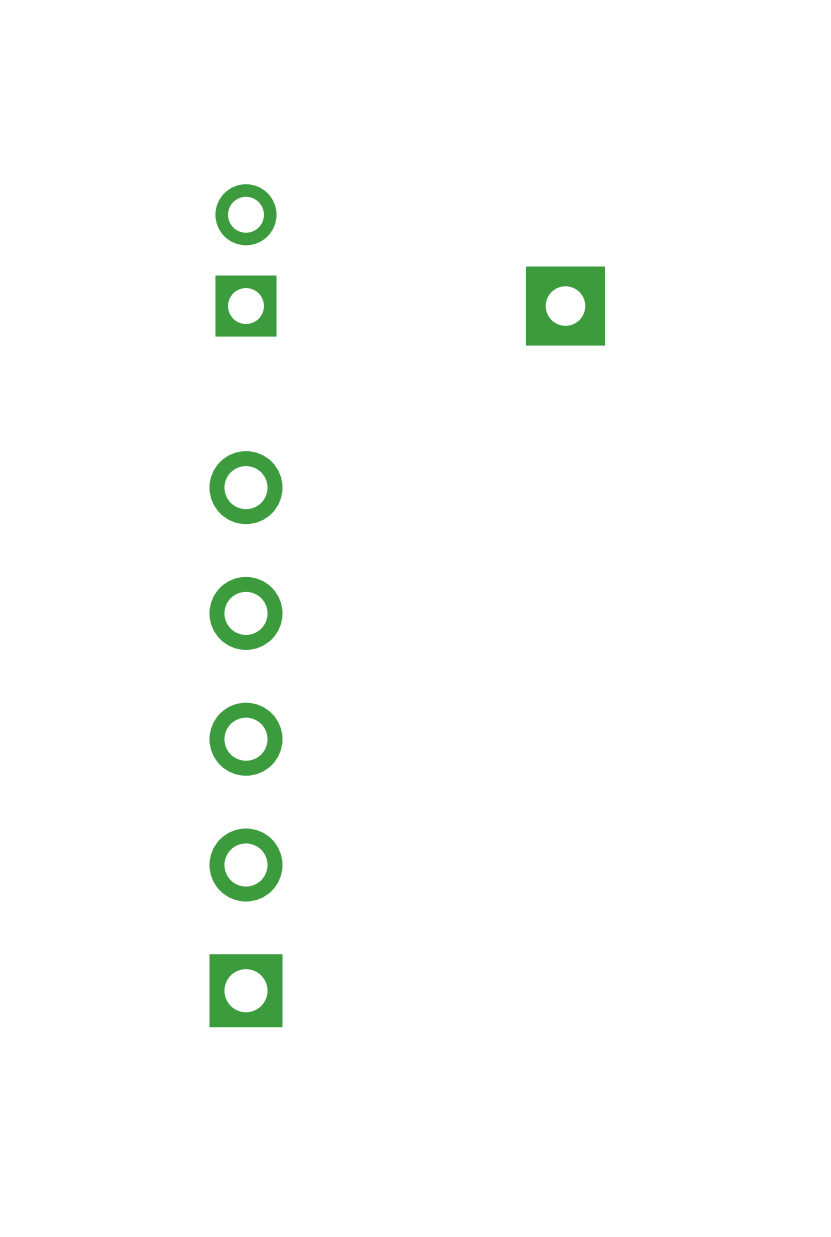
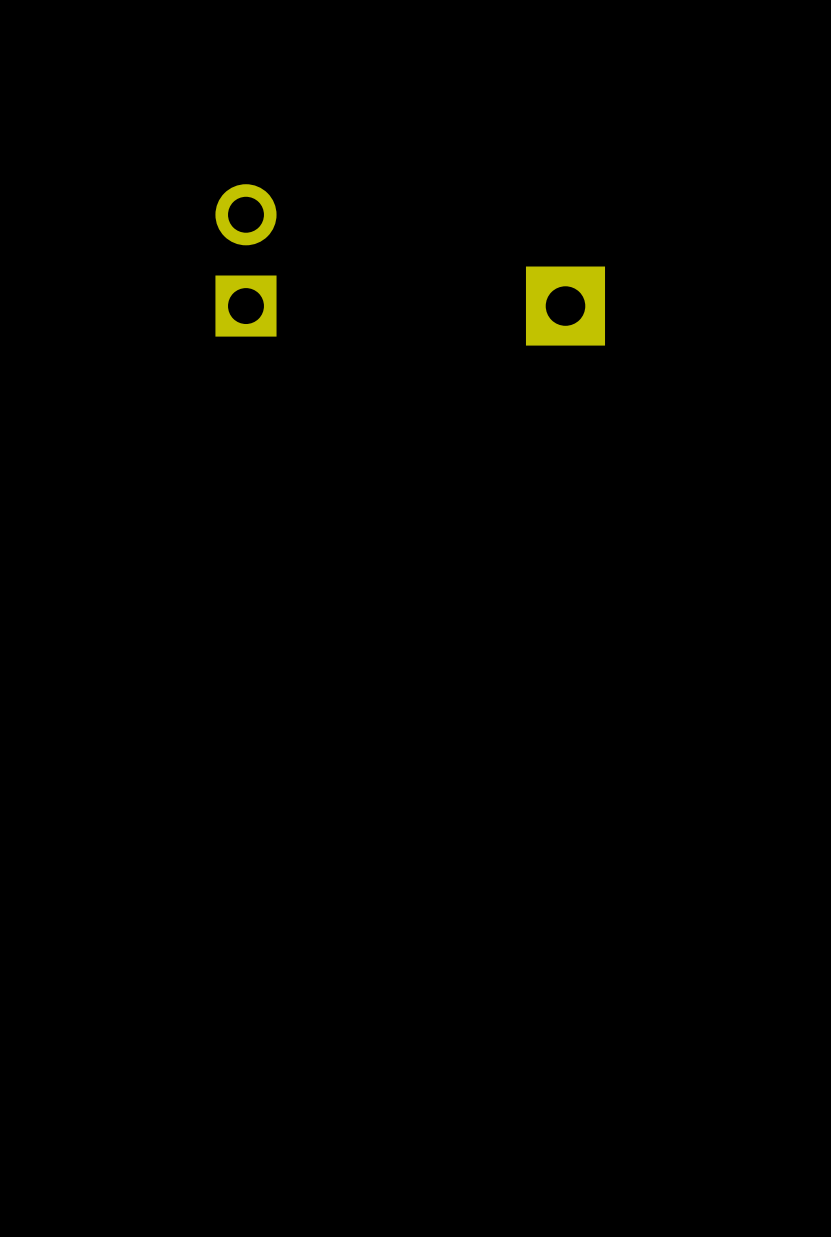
part: (245, 739) -> none

